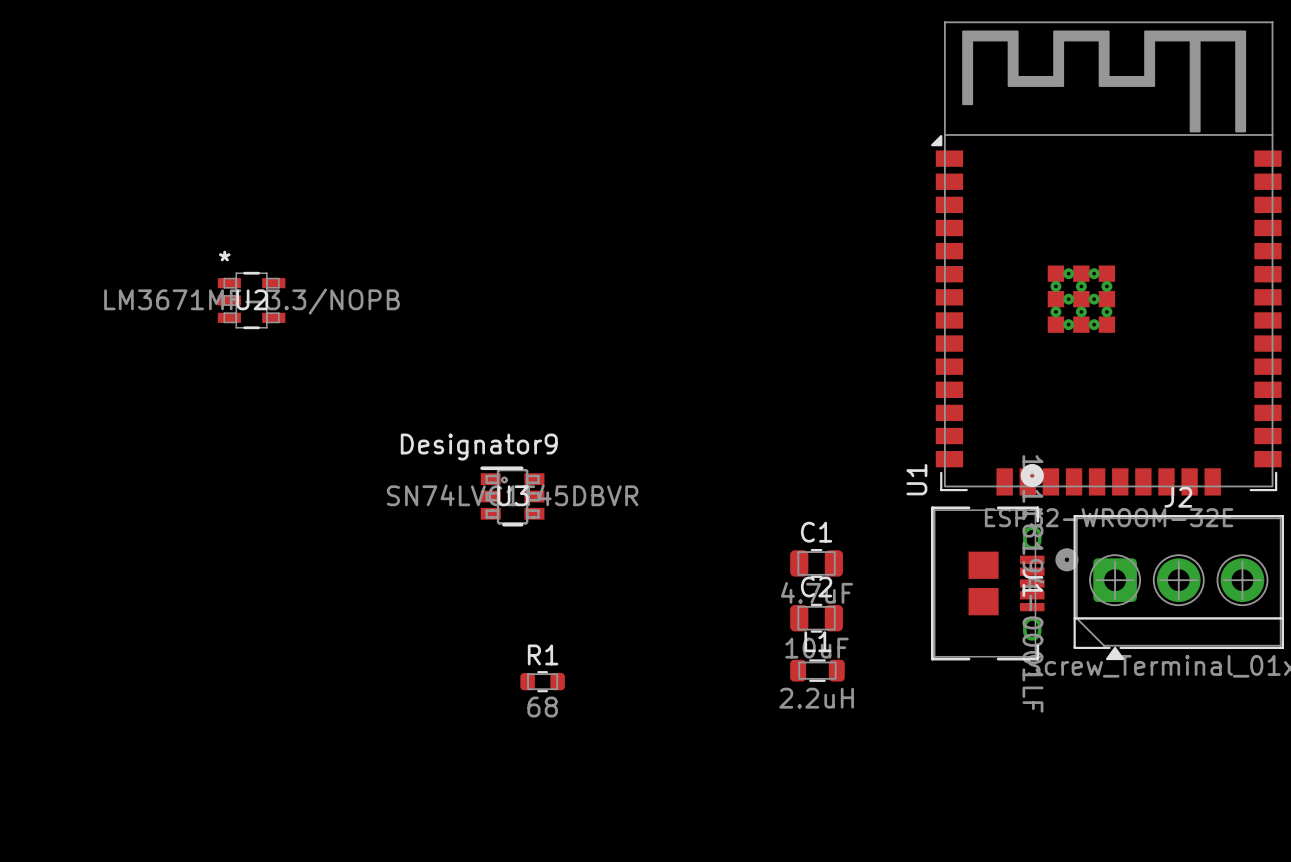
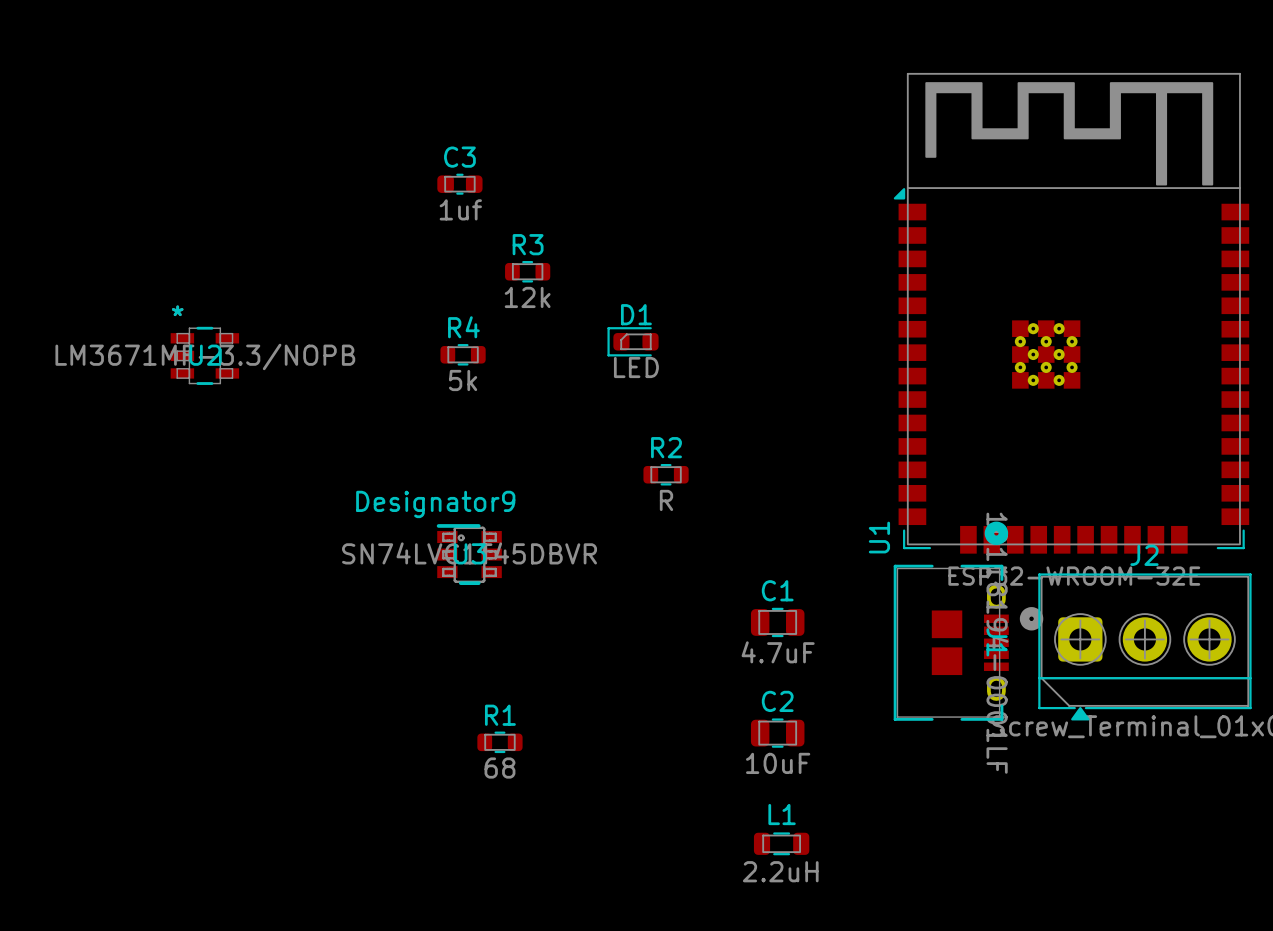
C3: none -> 1uf (459, 184)
R3: none -> 12k (527, 271)
D1: none -> LED (633, 341)
R4: none -> 5k (463, 354)
R2: none -> R (666, 474)
C2 position: (816, 618) -> (777, 733)
L1 position: (817, 670) -> (781, 843)

